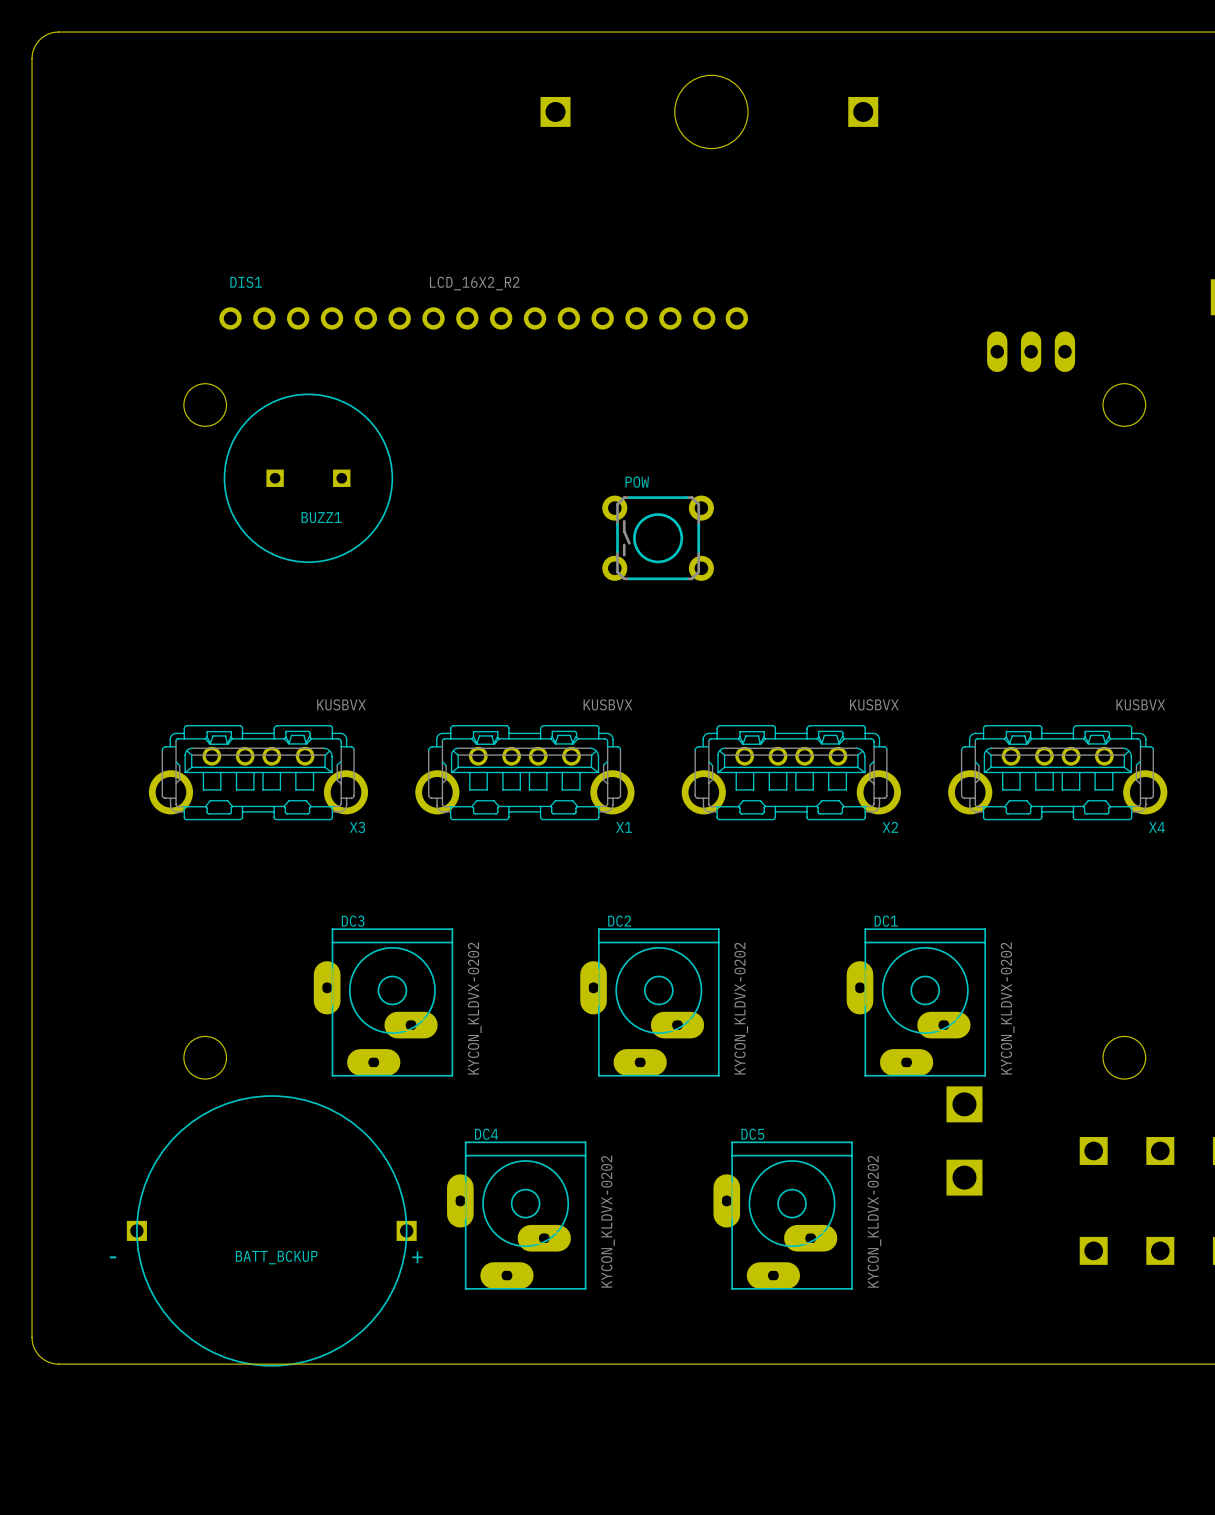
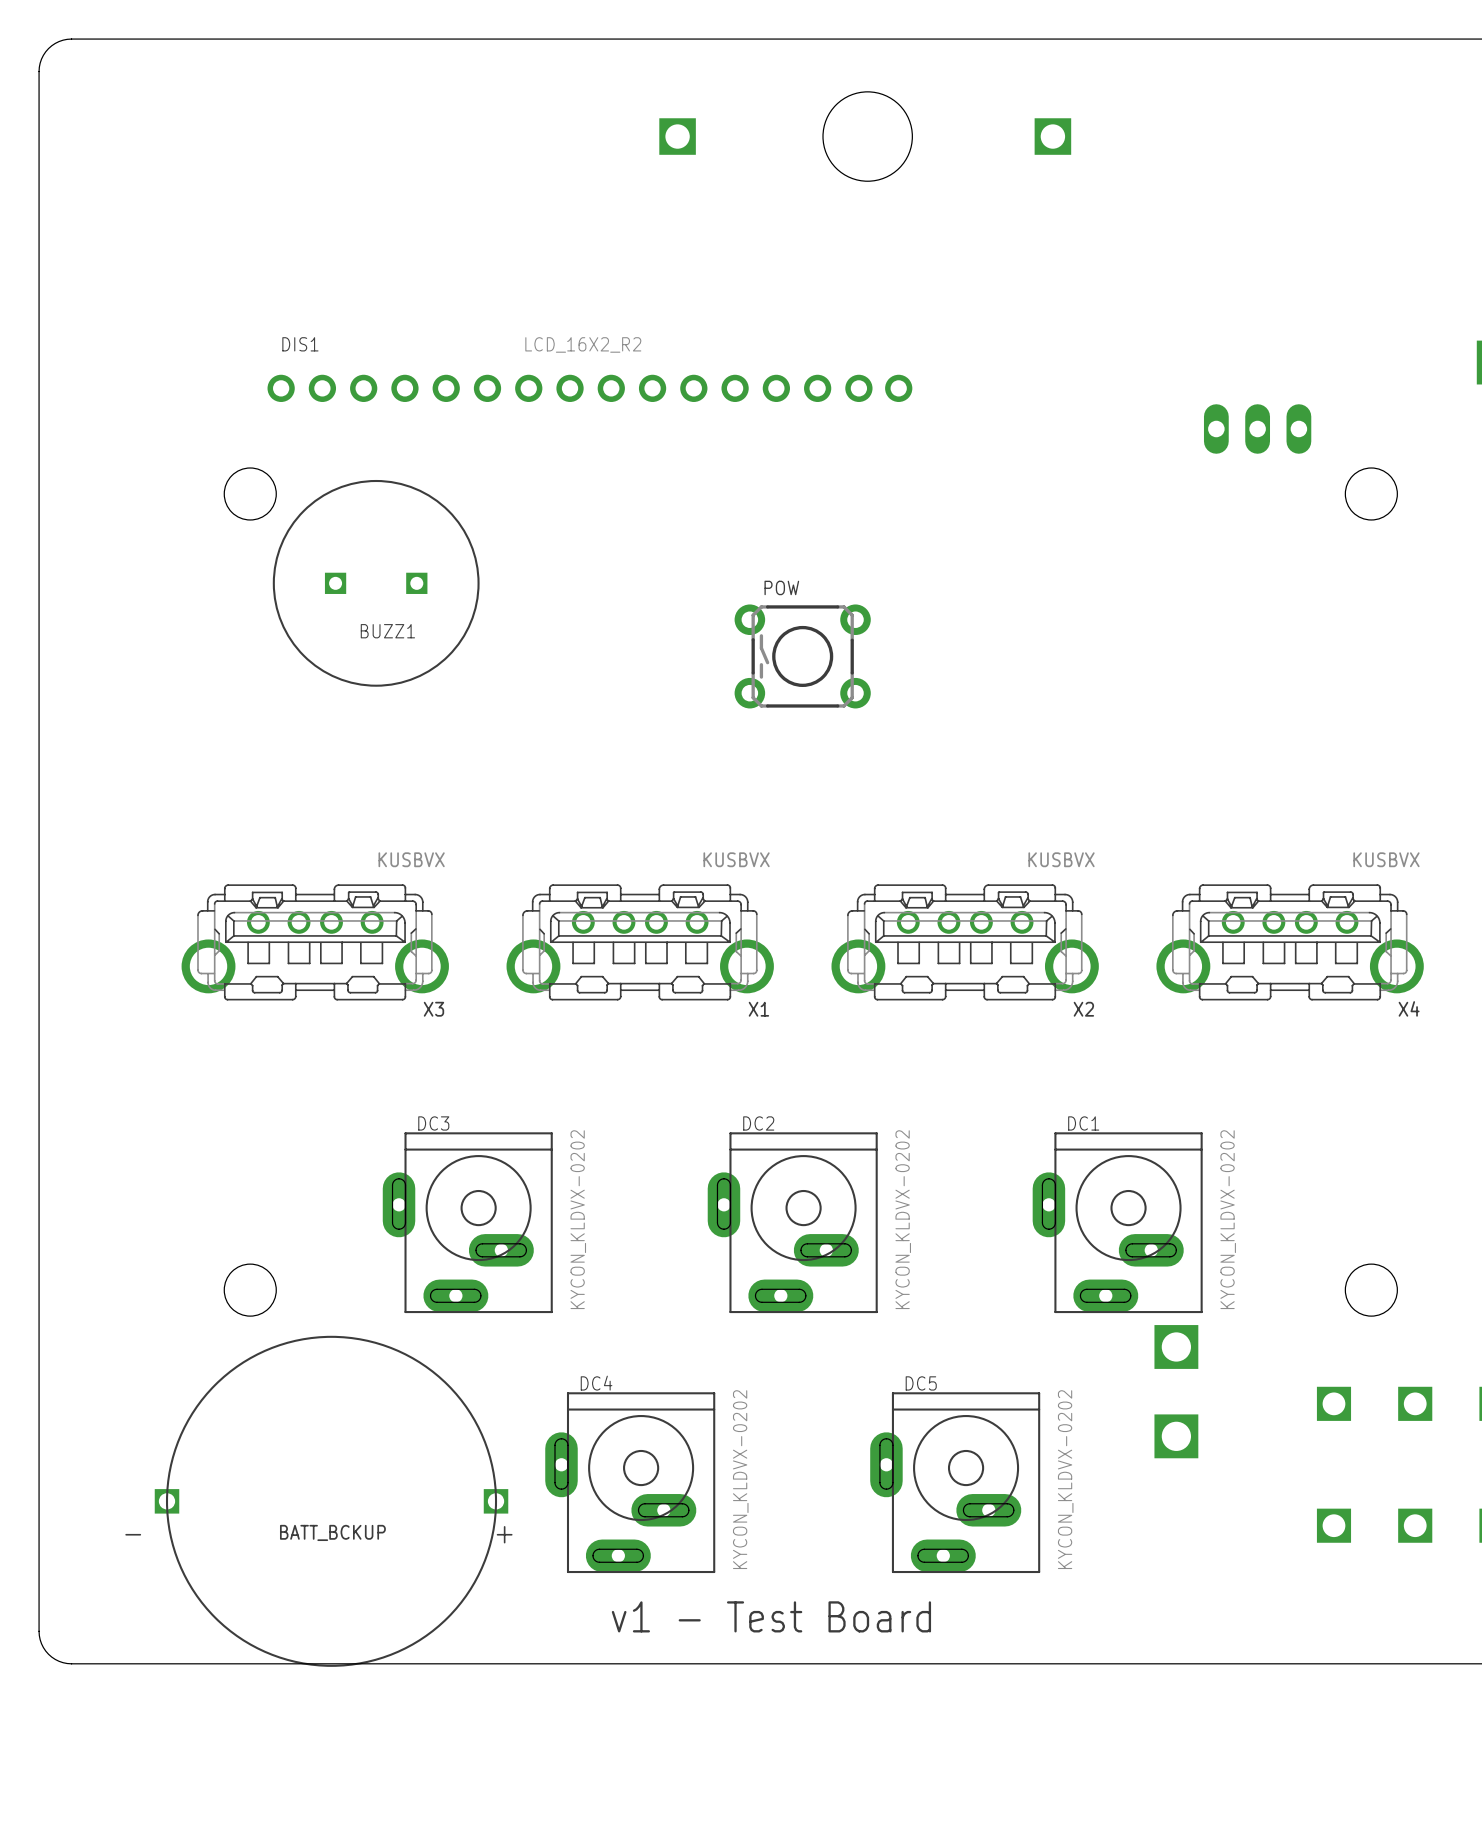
text: none -> v1 - Test Board (771, 1616)

